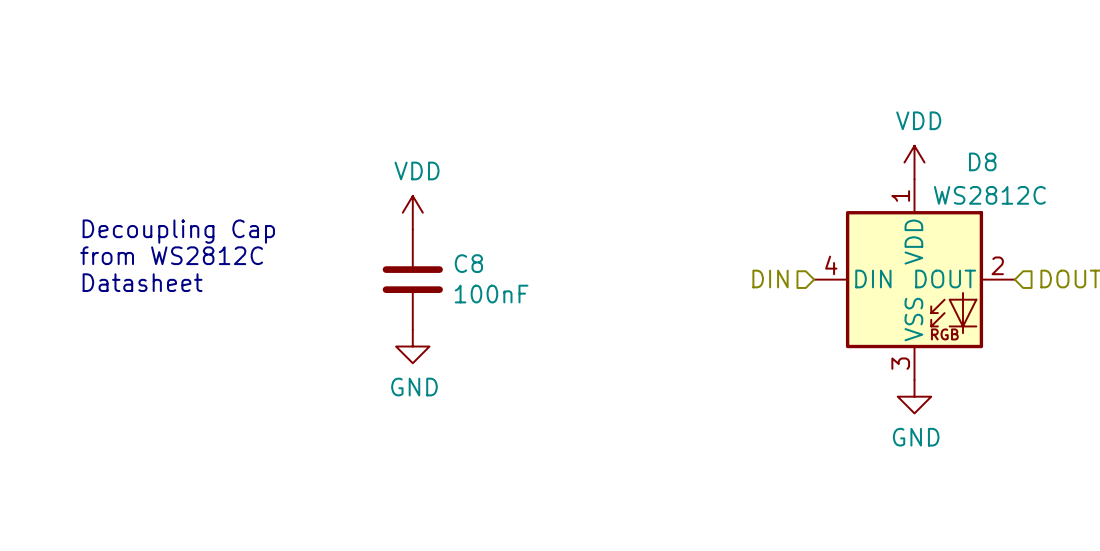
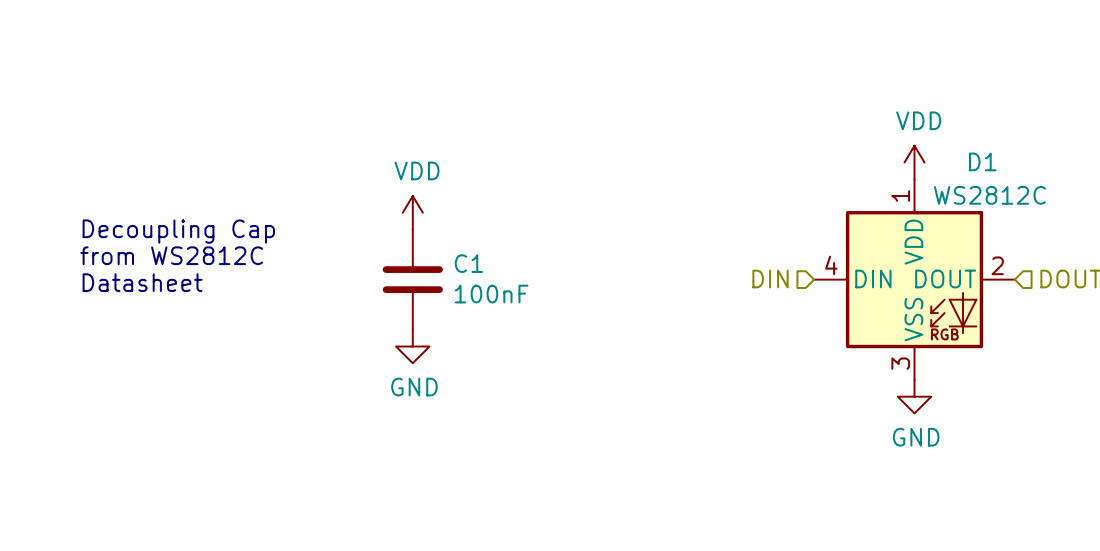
D8 name: D8 (982, 161) -> D1 (982, 161)
C8 name: C8 (468, 263) -> C1 (468, 263)

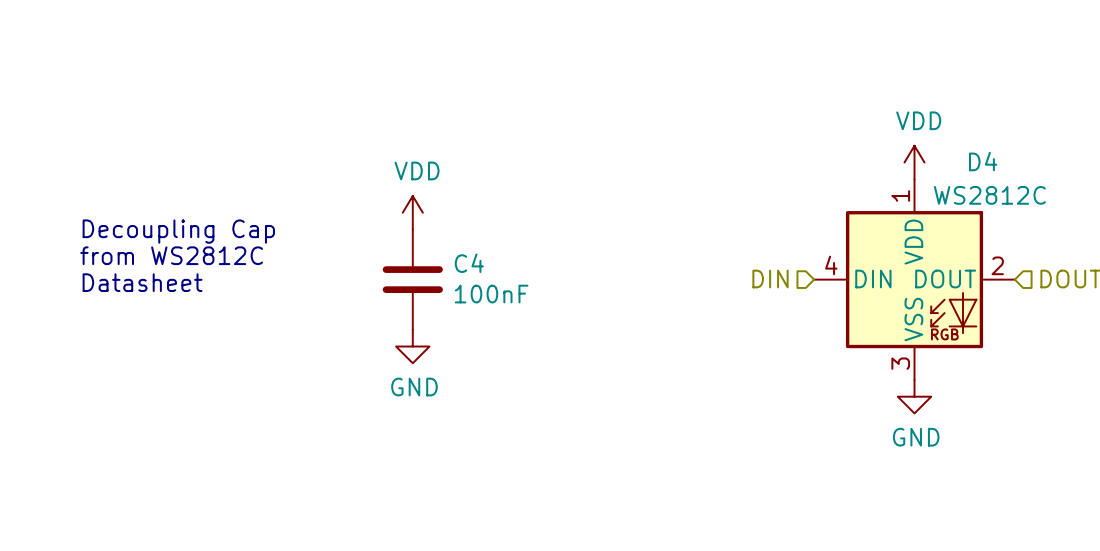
D1 name: D1 (982, 161) -> D4 (983, 161)
C1 name: C1 (468, 263) -> C4 (469, 263)

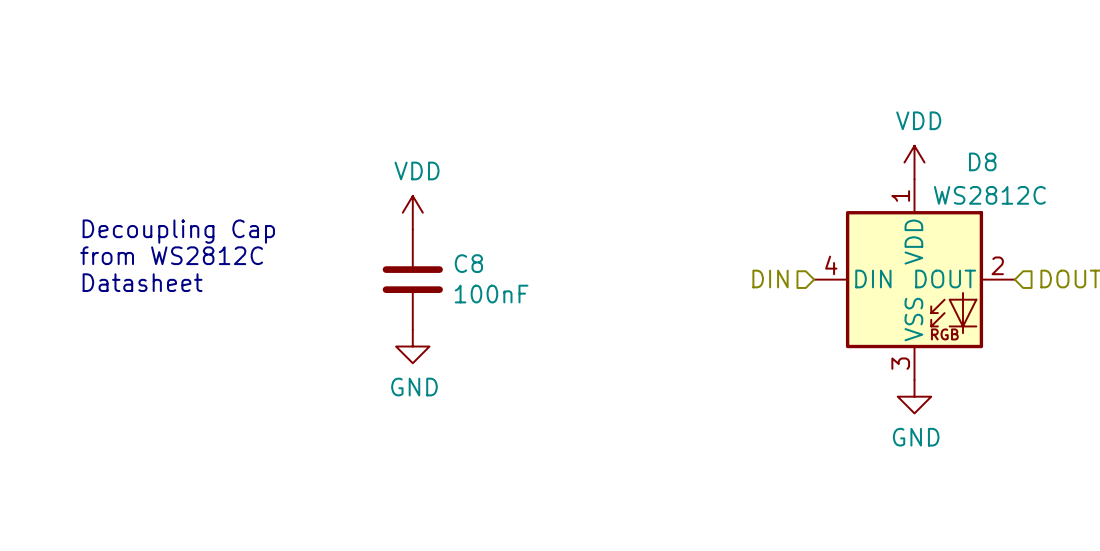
D4 name: D4 (983, 161) -> D8 (982, 161)
C4 name: C4 (469, 263) -> C8 (468, 263)

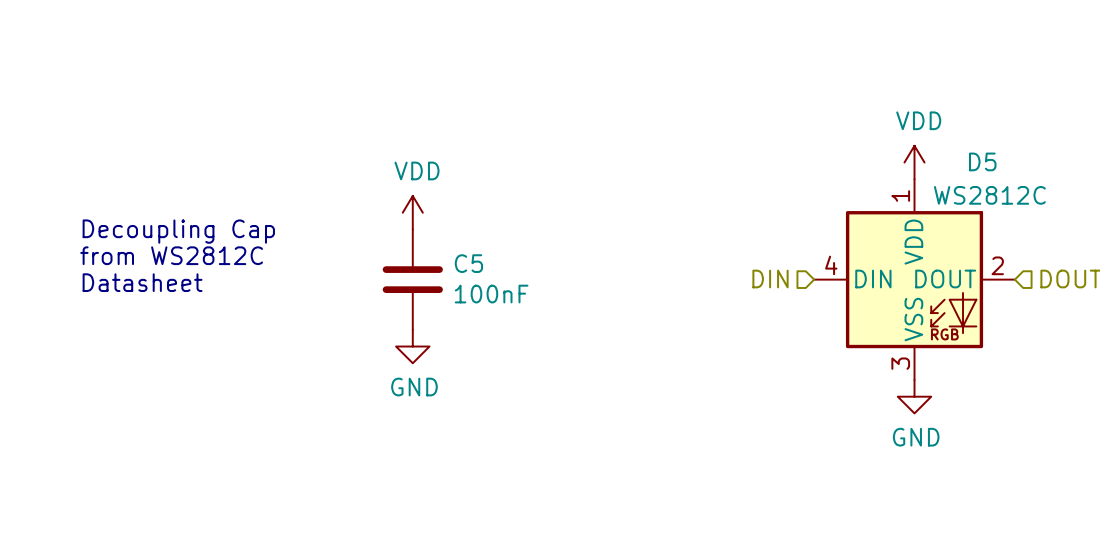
D8 name: D8 (982, 161) -> D5 (982, 161)
C8 name: C8 (468, 263) -> C5 (468, 263)

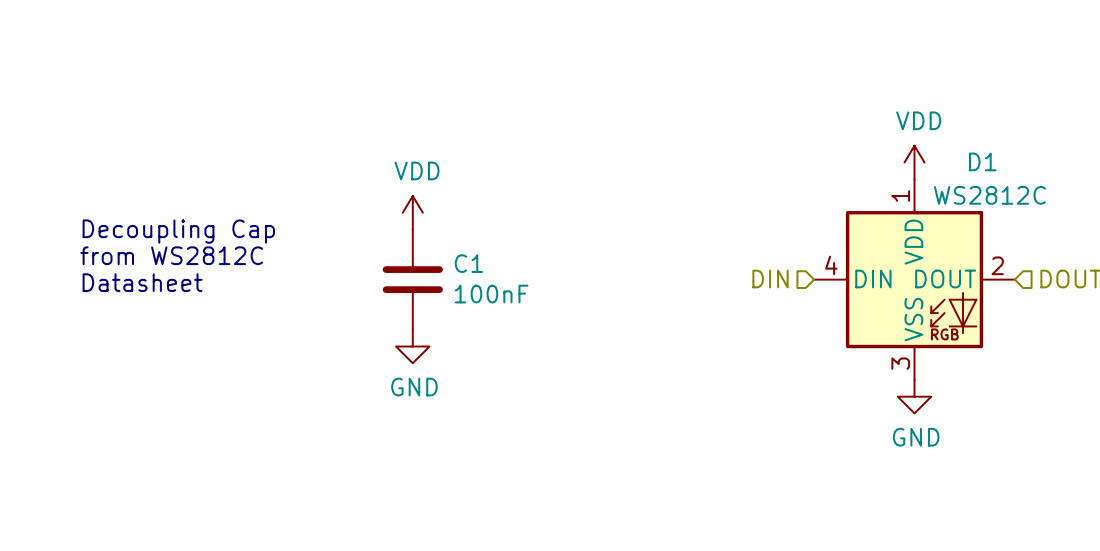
D5 name: D5 (982, 161) -> D1 (982, 161)
C5 name: C5 (468, 263) -> C1 (468, 263)

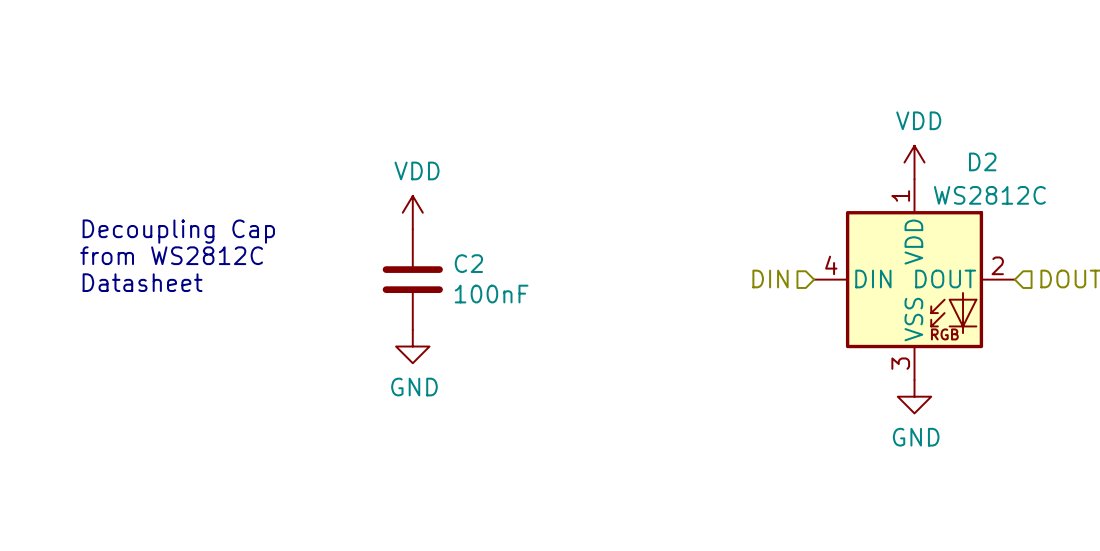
D1 name: D1 (982, 161) -> D2 (982, 161)
C1 name: C1 (468, 263) -> C2 (468, 263)

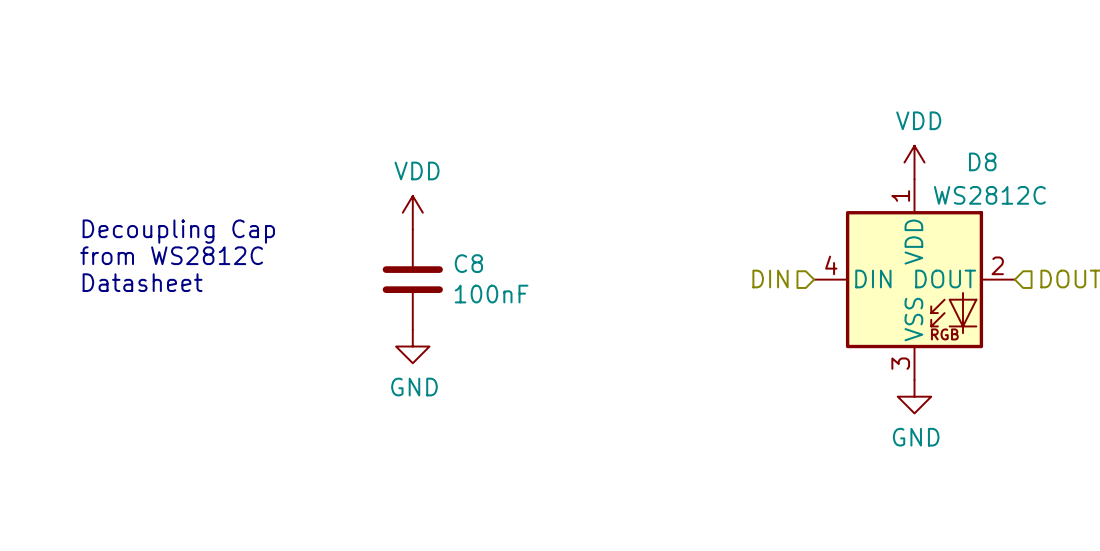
D2 name: D2 (982, 161) -> D8 (982, 161)
C2 name: C2 (468, 263) -> C8 (468, 263)

